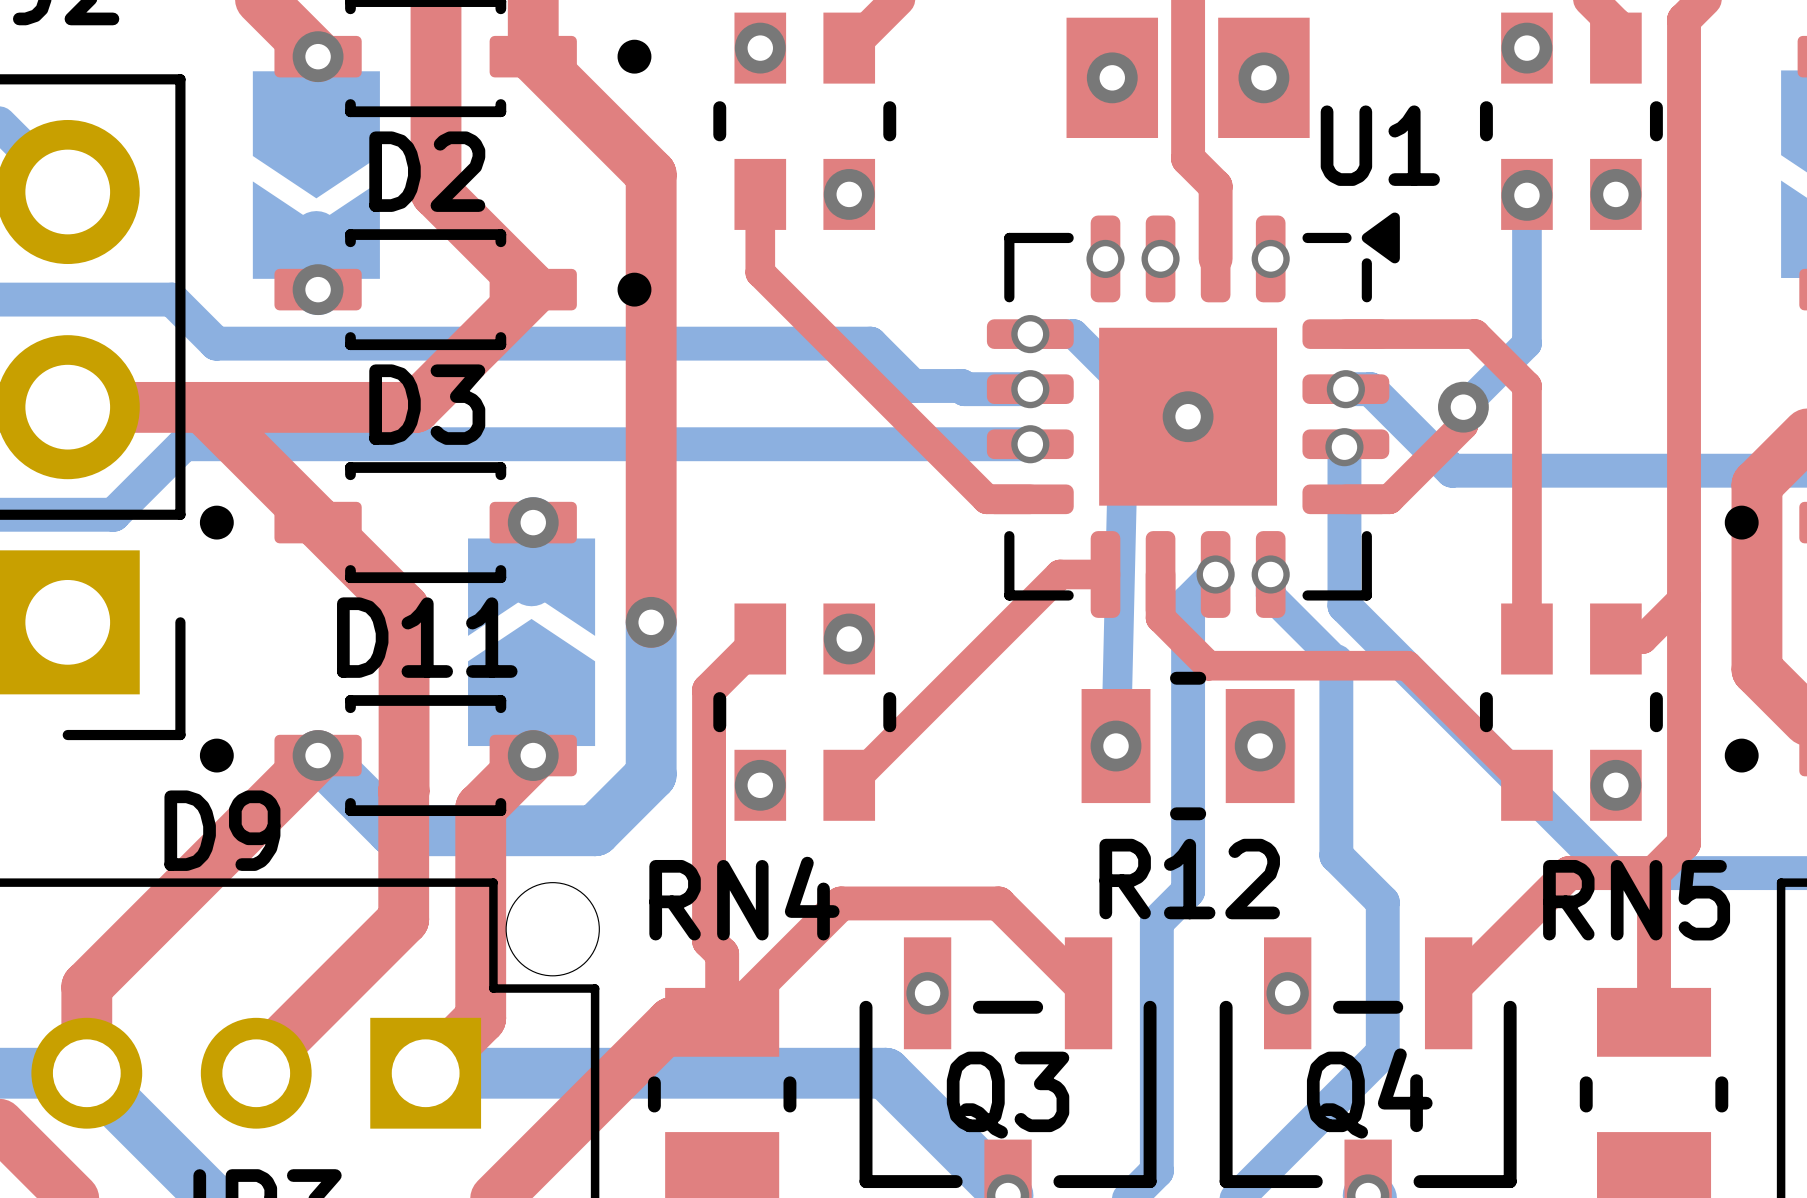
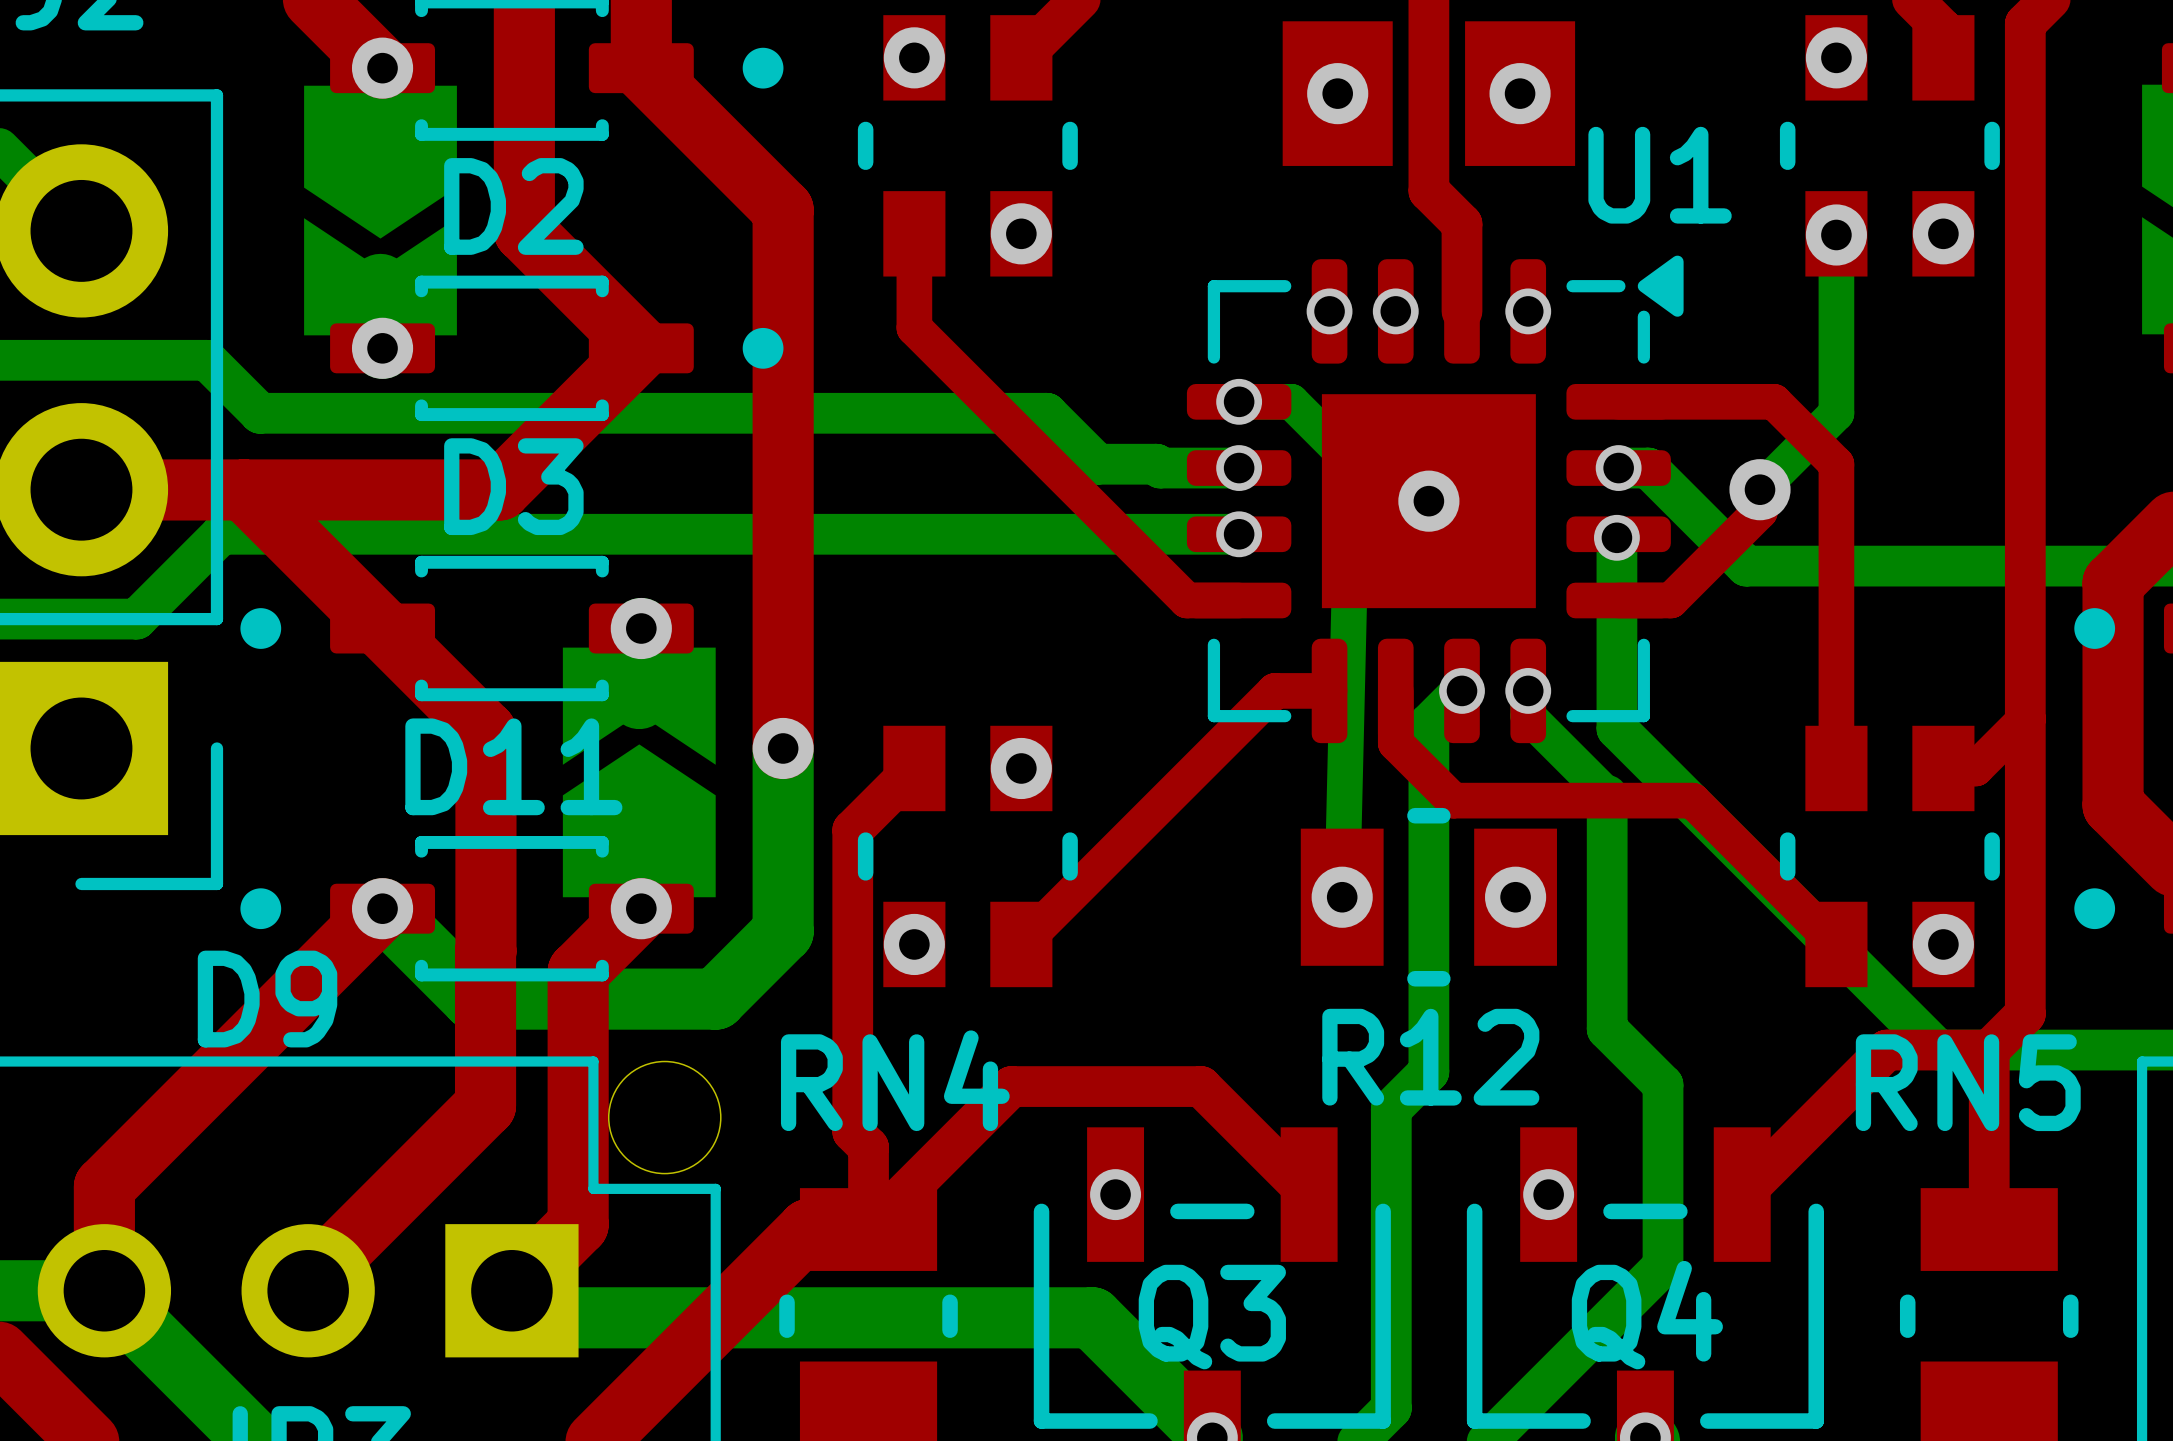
bottom track: (425, 1073) (885, 1073) (908, 1095) -> (538, 1317) (1092, 1317)

